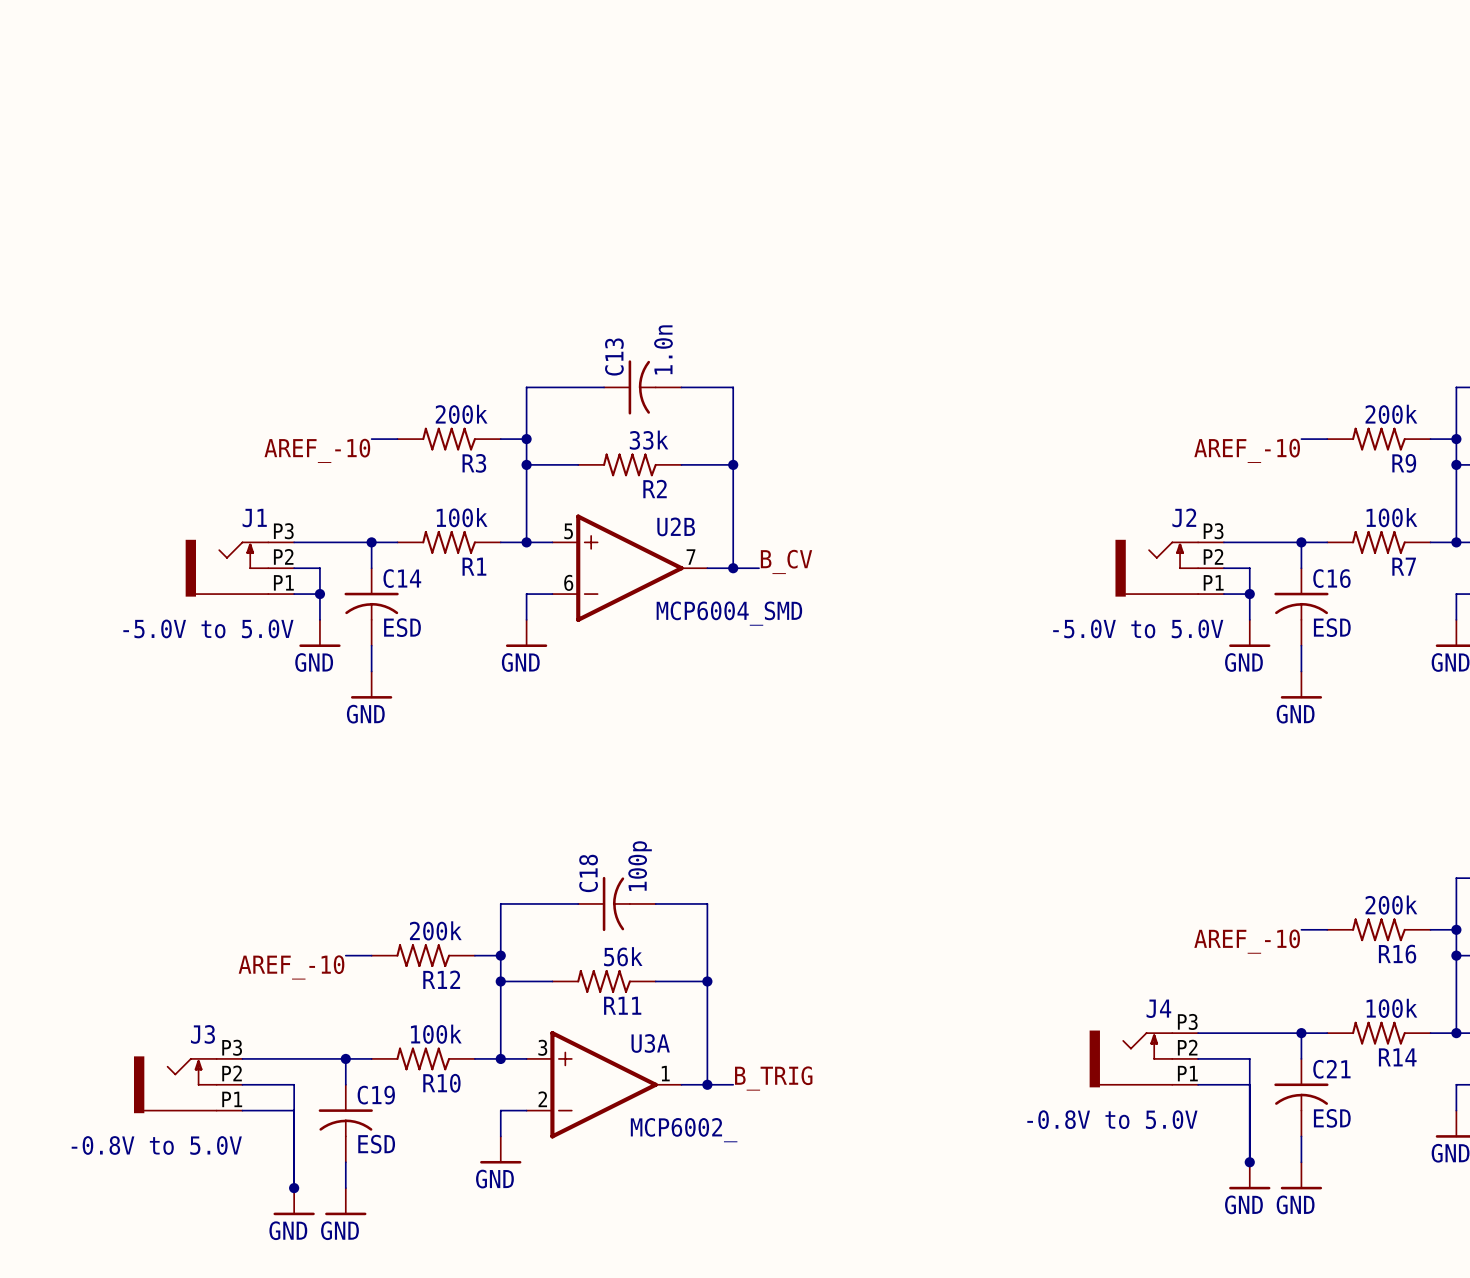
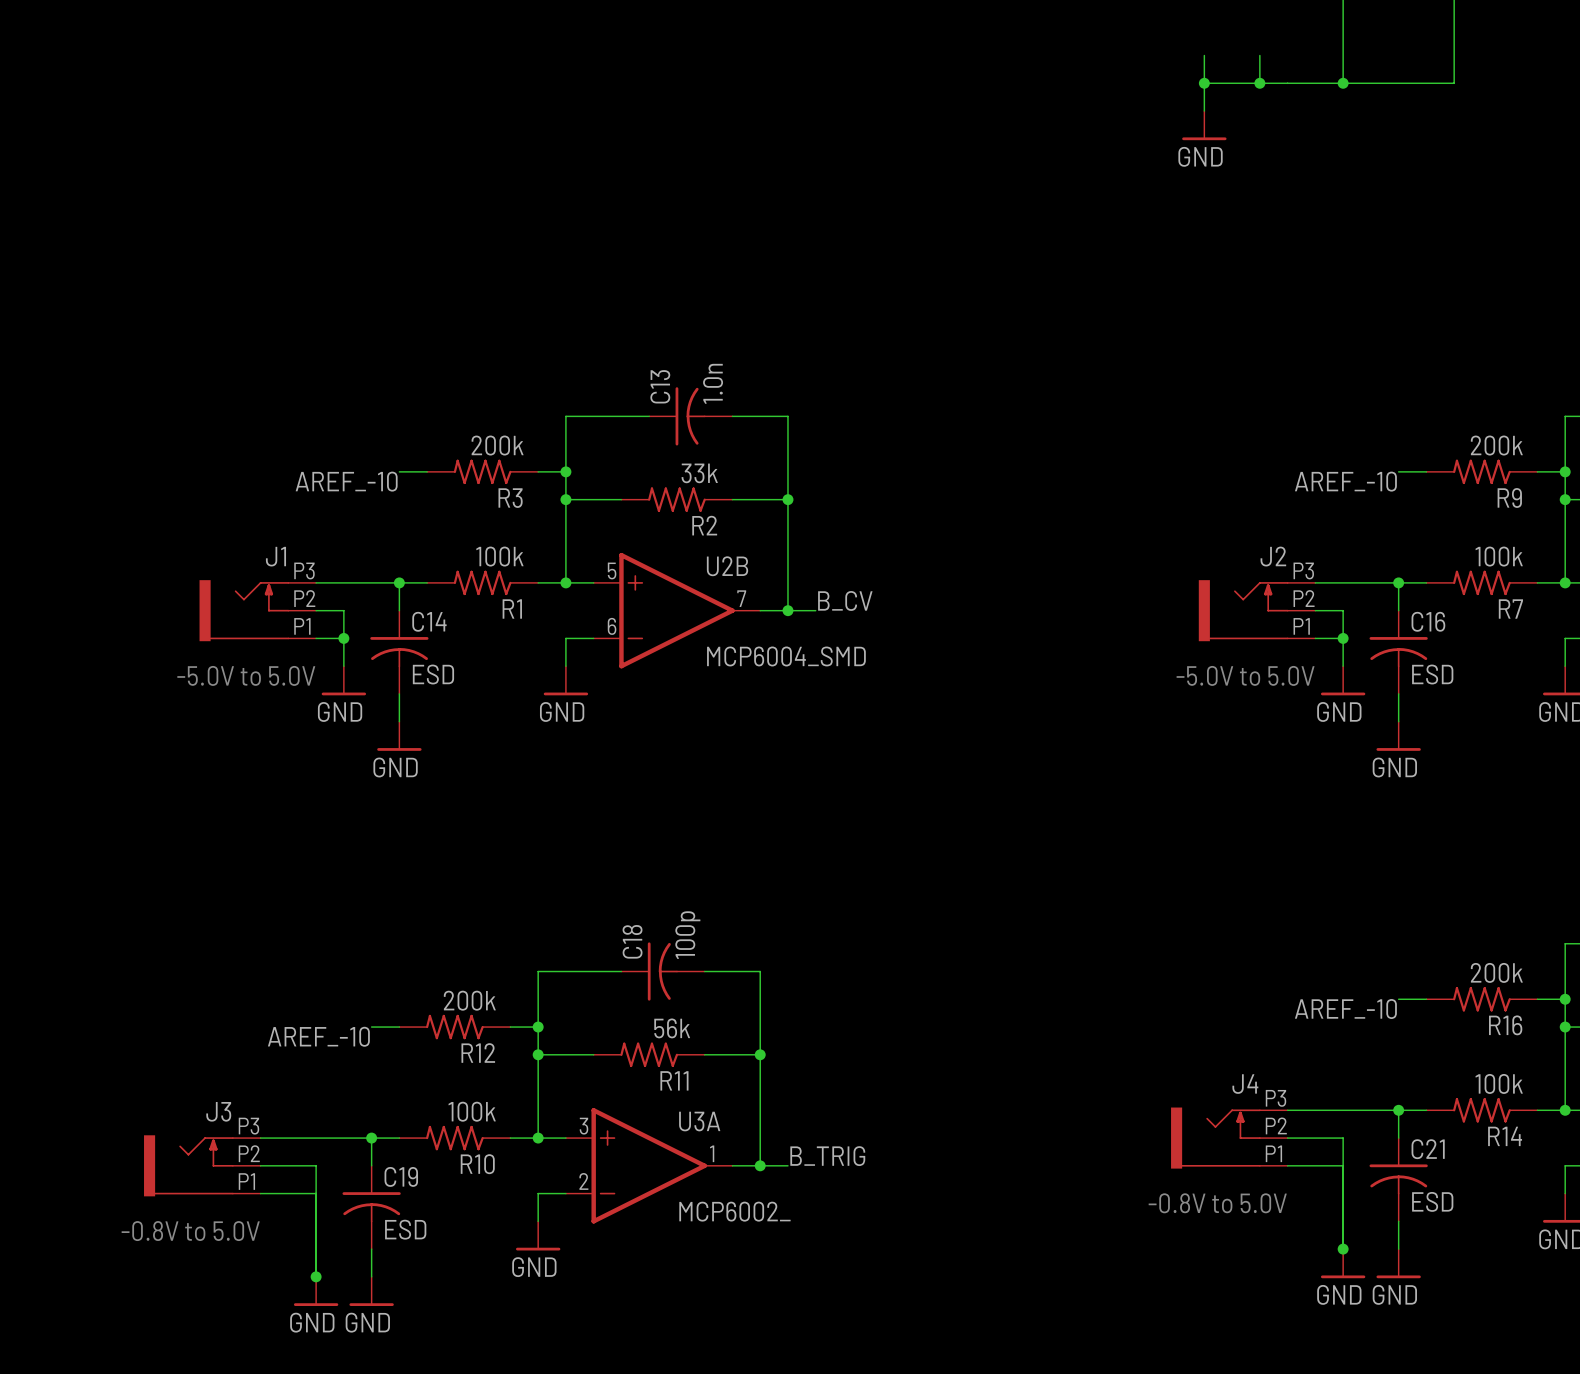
wire: none -> (1343, 0) (1343, 83)
wire: none -> (1454, 0) (1454, 83) (1204, 83)
wire: none -> (1204, 55) (1204, 111)
wire: none -> (1259, 55) (1259, 83)
junction: none -> (1204, 83)
junction: none -> (1259, 83)
junction: none -> (1343, 83)
power symbol: none -> GND (1204, 125)

